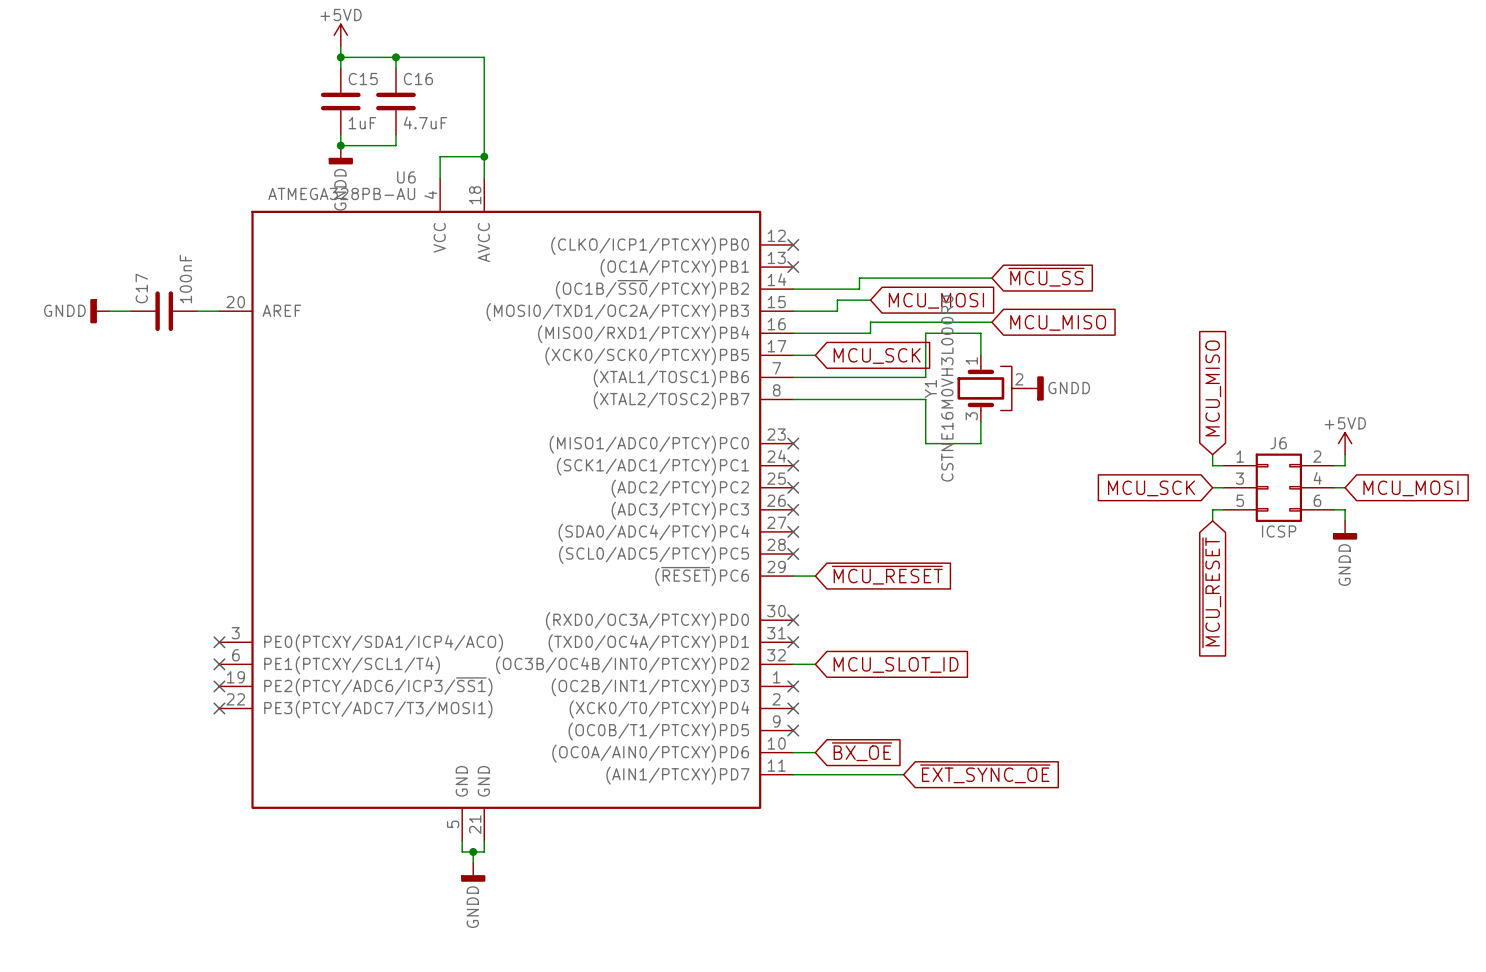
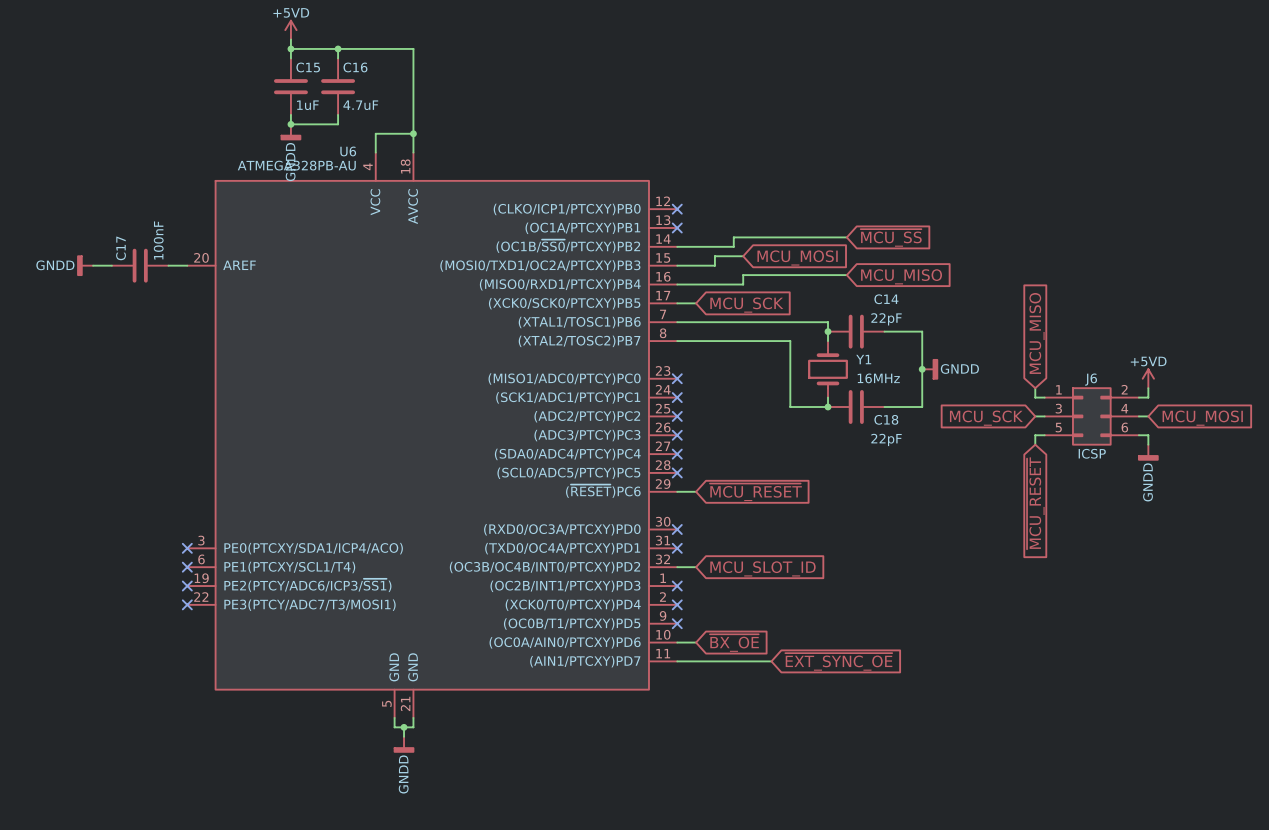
Y1 symbol: [957, 355, 1026, 422] -> [808, 341, 848, 398]
wire: (980, 355) (980, 333) (925, 333) (925, 377) -> (828, 341) (828, 322) (790, 322)
Y1 name position: Y1 (930, 388) -> Y1 (863, 359)
Y1 value: CSTNE16M0VH3L000R0 (947, 388) -> 16MHz (878, 378)
junction: none -> (828, 331)
C14: none -> 22pF (856, 331)
power symbol position: GNDD (1034, 388) -> GNDD (930, 369)
wire: none -> (884, 331) (922, 331) (922, 407) (884, 407)
wire: (980, 421) (980, 443) (925, 443) -> (828, 397) (828, 407) (790, 407) (790, 378)
junction: none -> (922, 369)
junction: none -> (828, 407)
C18: none -> 22pF (856, 407)

